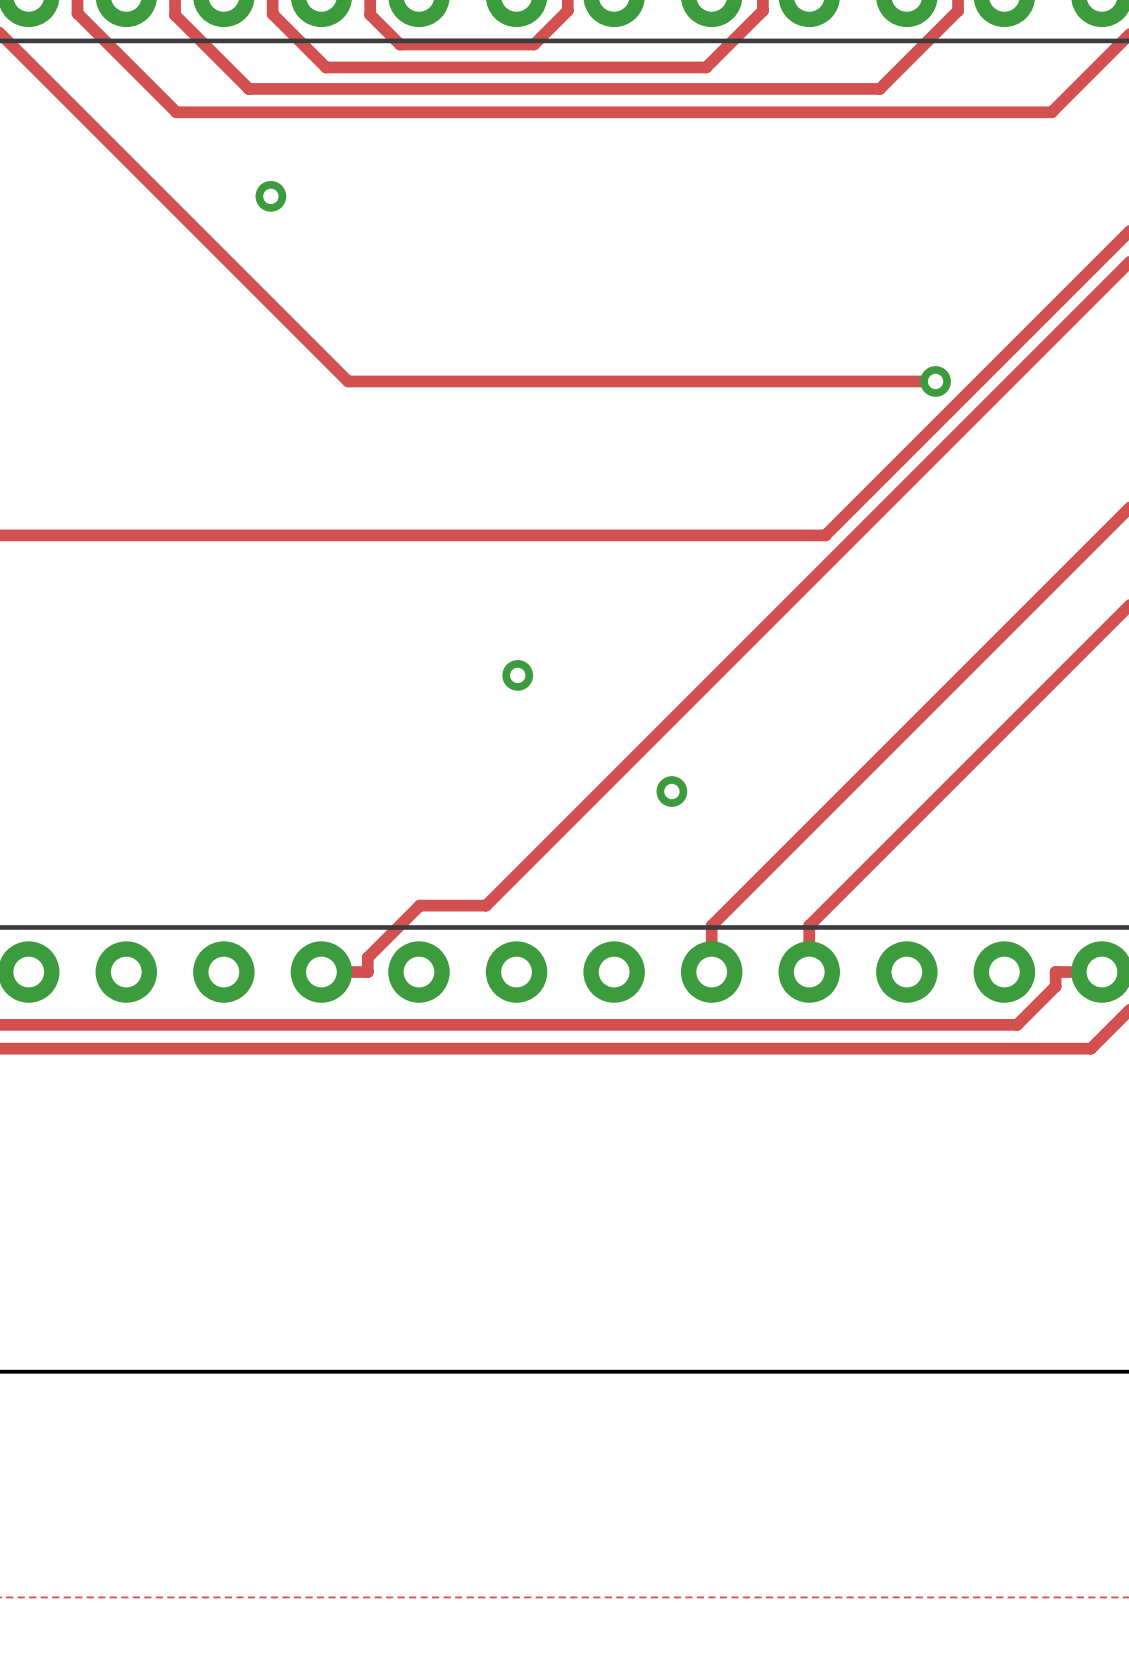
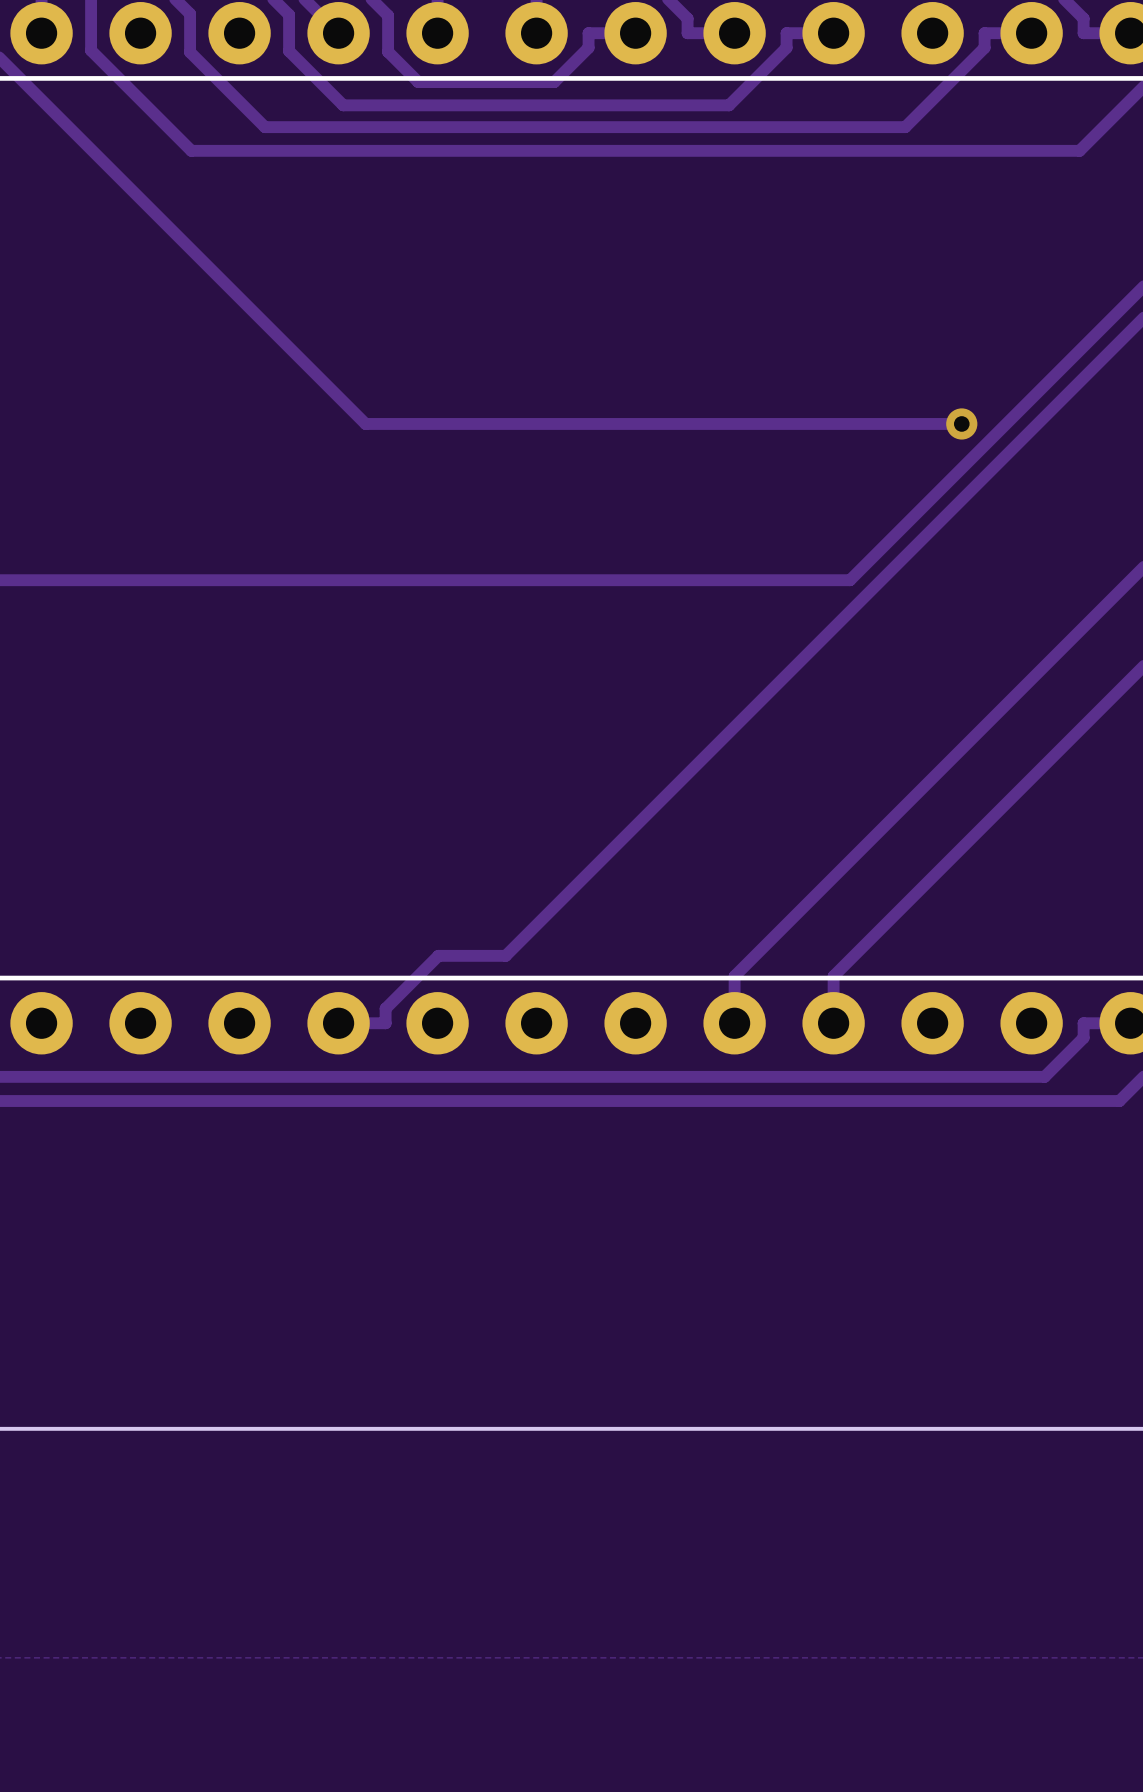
via: (270, 196) -> none
via: (517, 675) -> none
via: (671, 791) -> none

